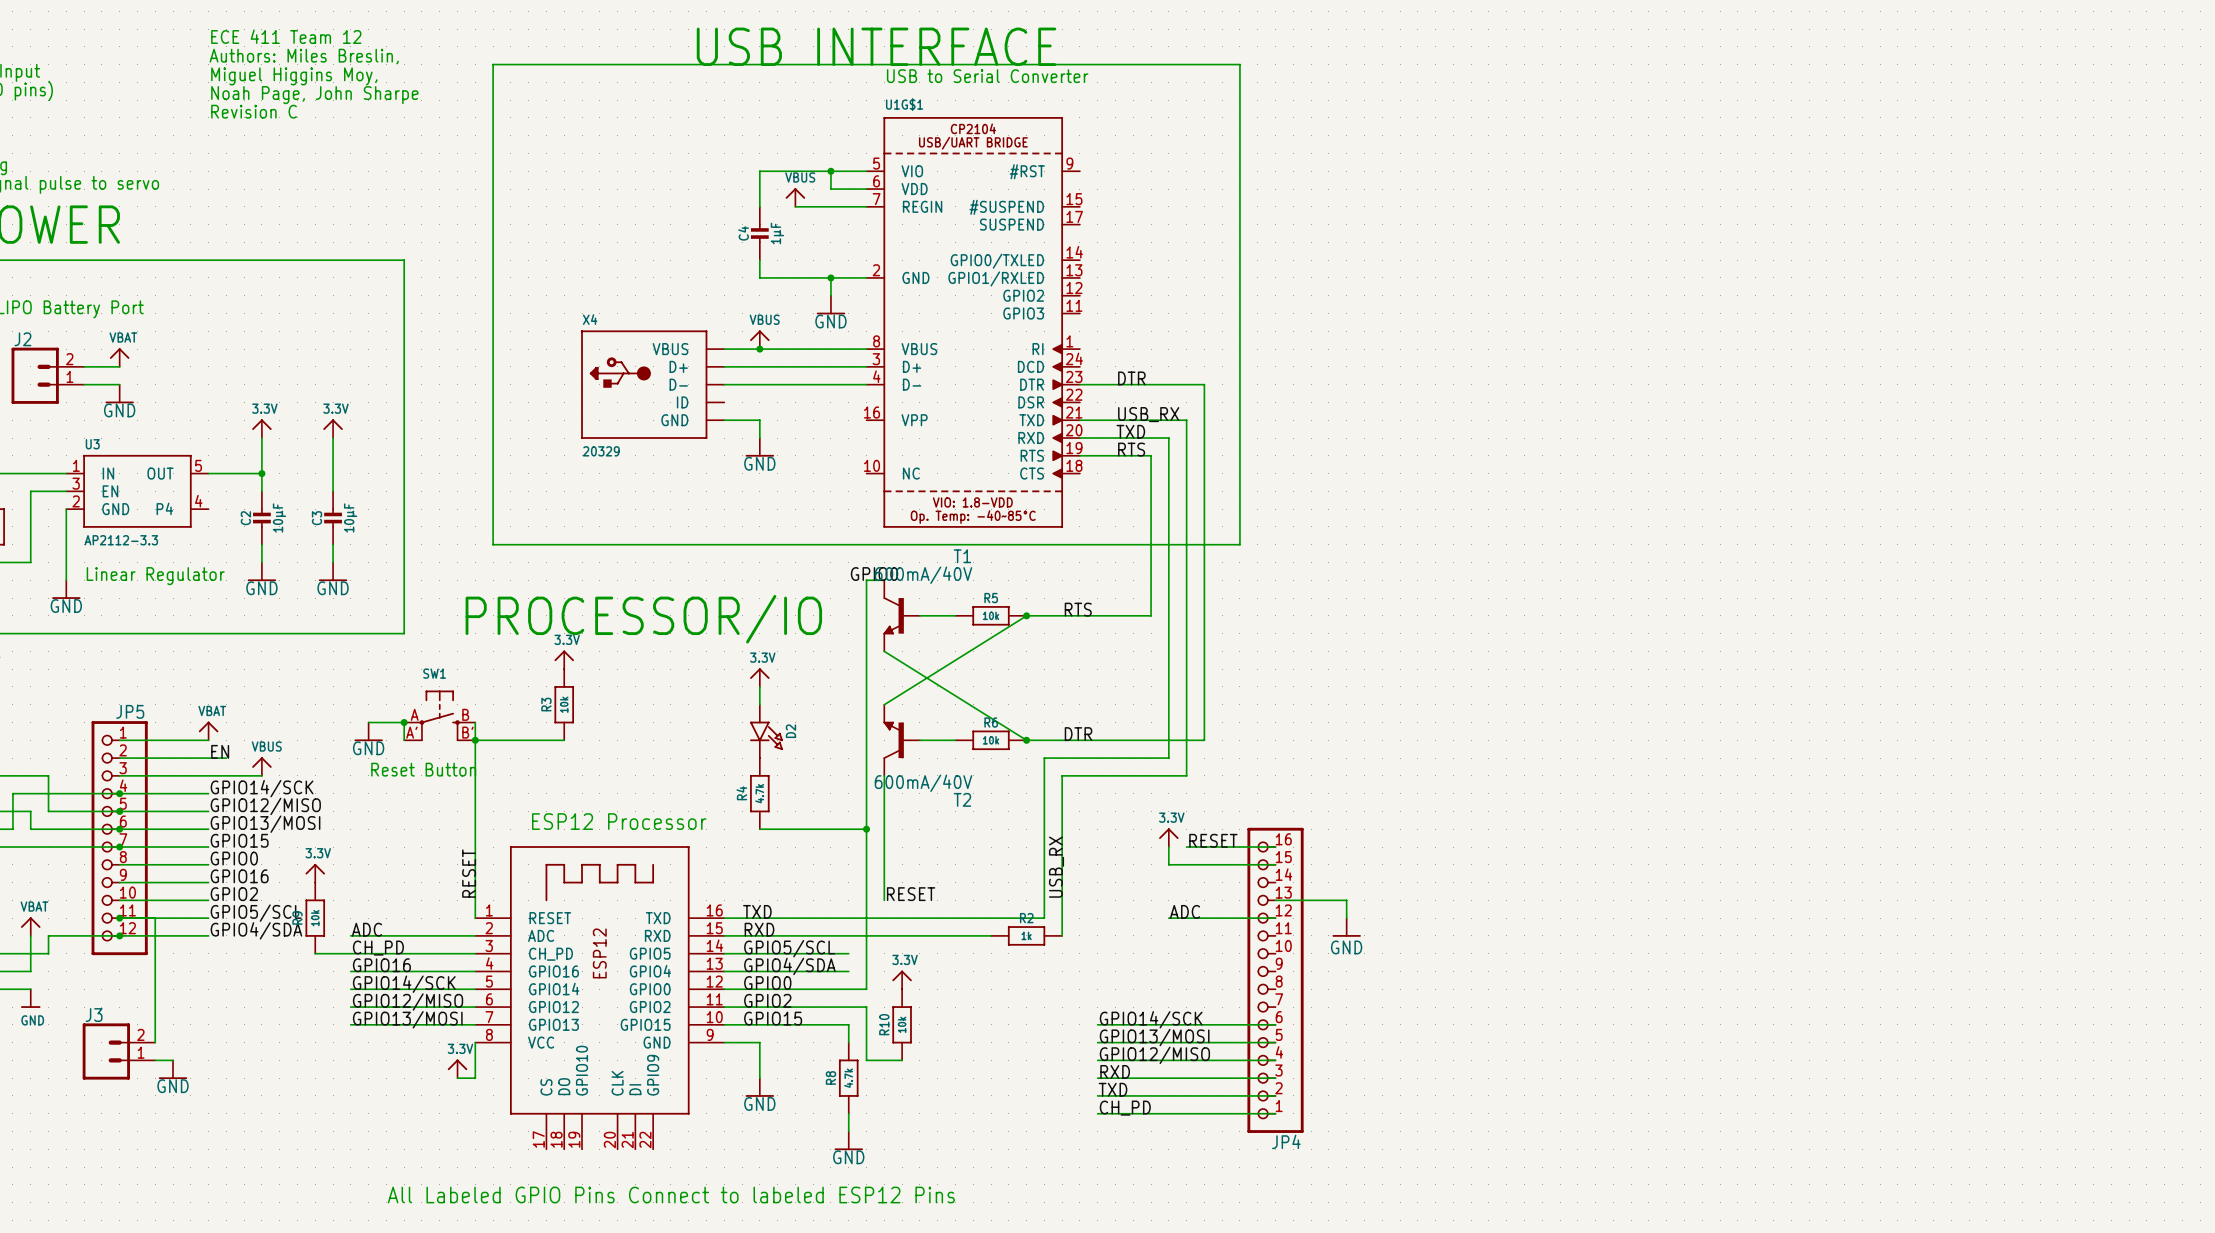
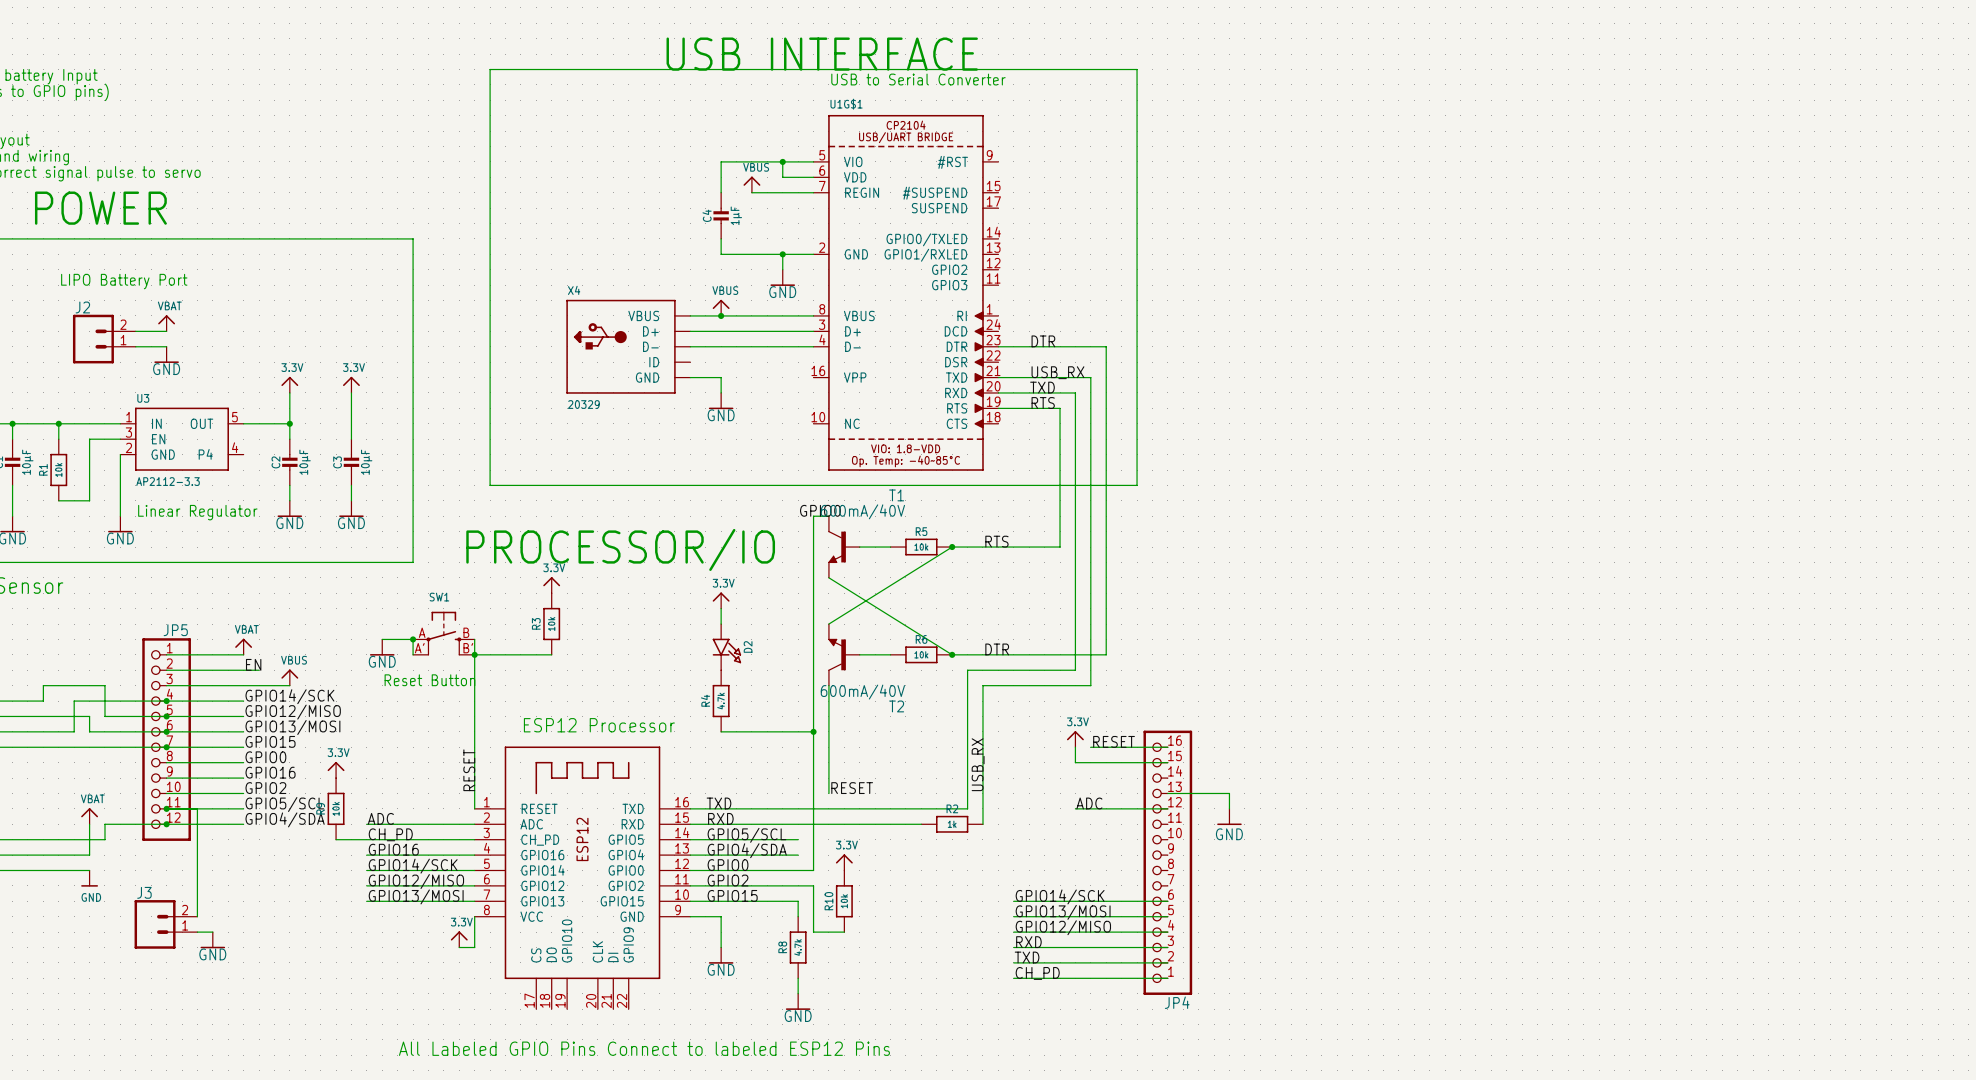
text: ECE 411 Team 12 (286, 36) -> none
text: Authors: Miles Breslin, (304, 56) -> none
text: Miguel Higgins Moy, (294, 76) -> none
text: Noah Page, John Sharpe (314, 95) -> none
text: Revision C (254, 111) -> none

